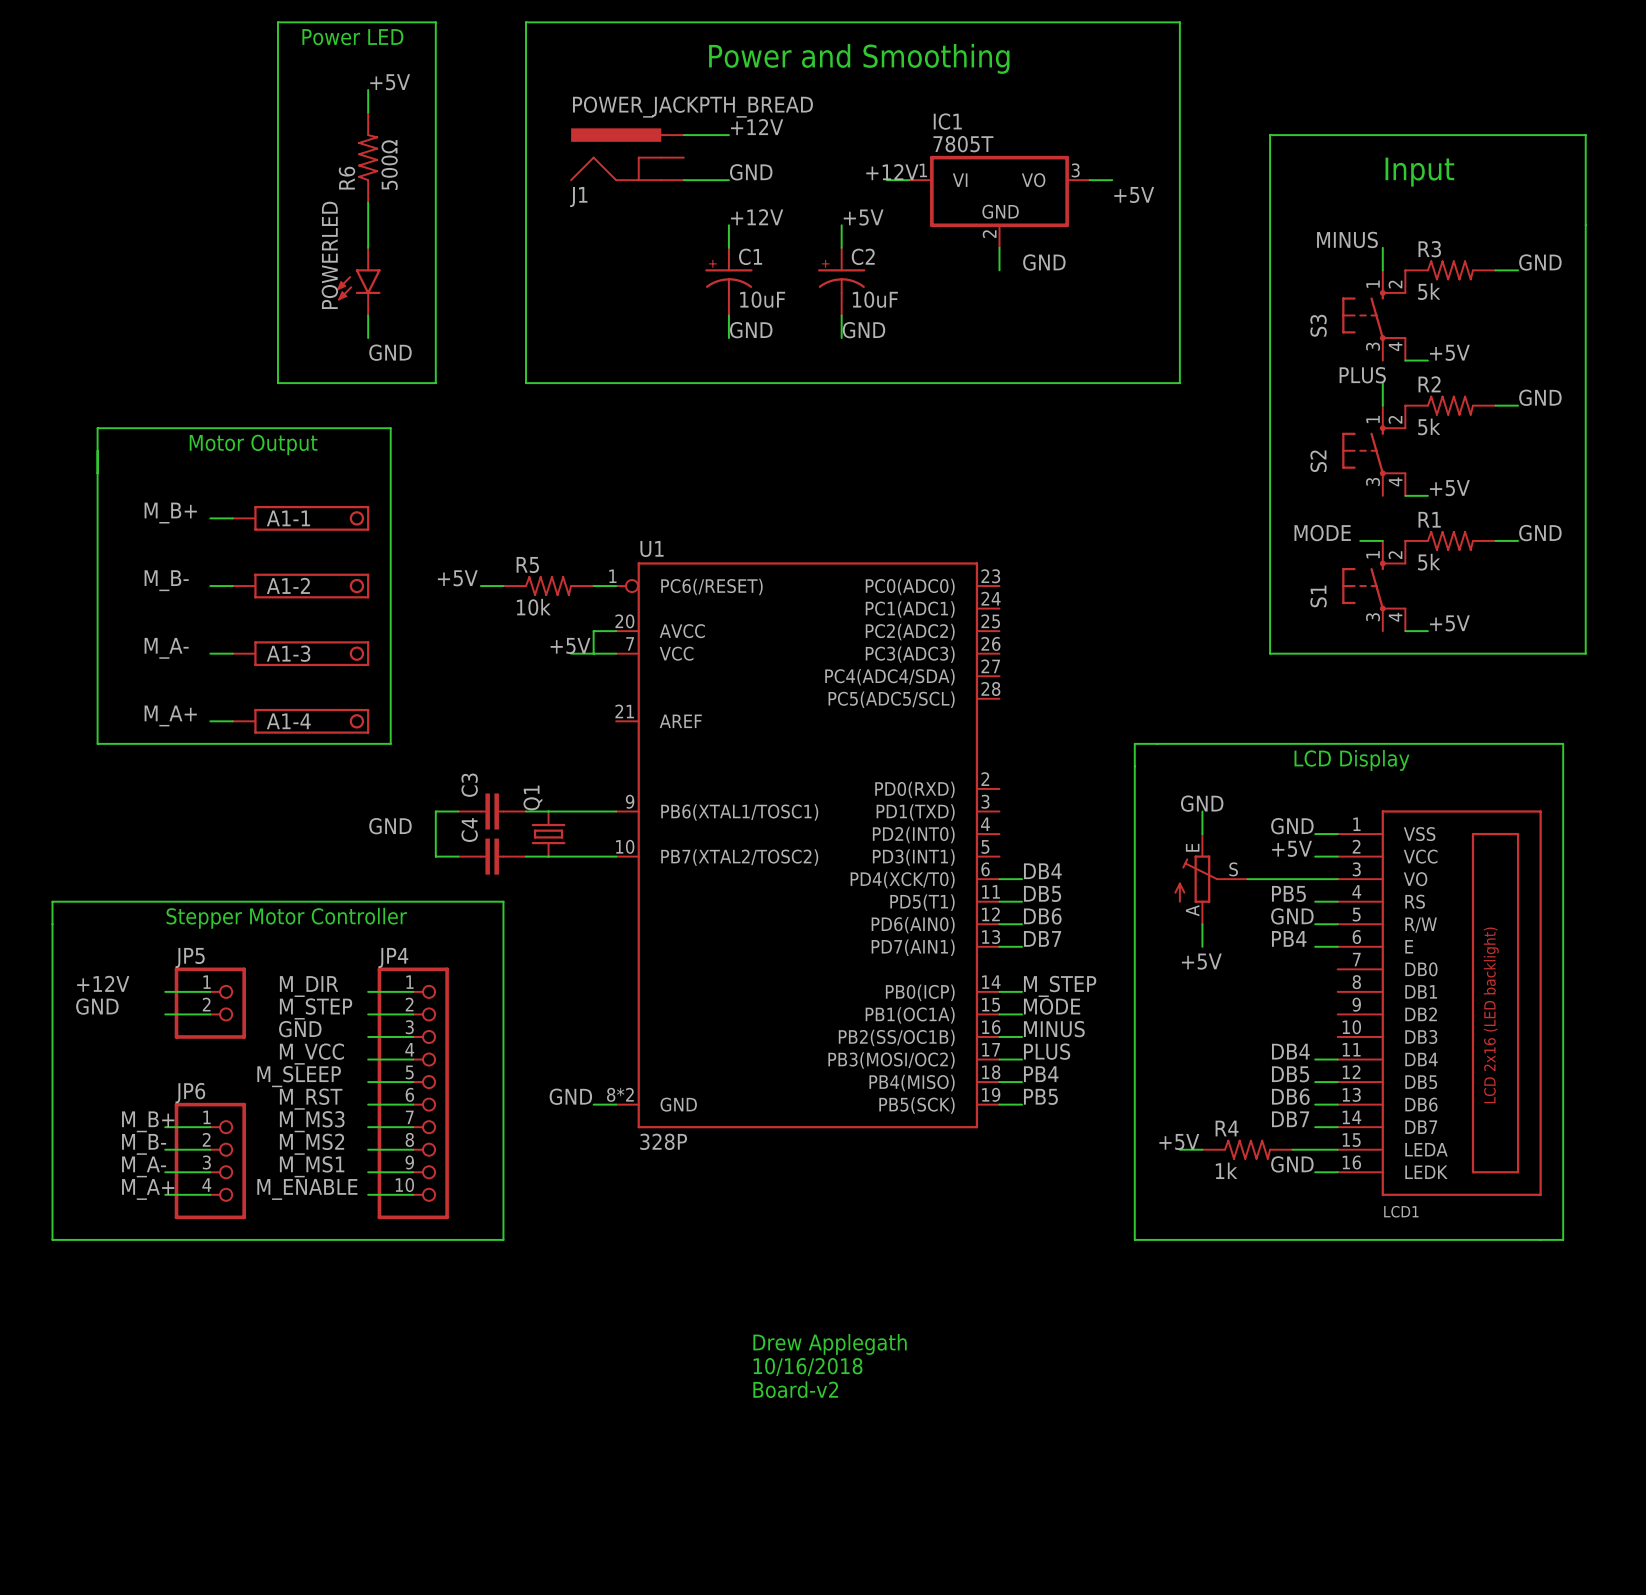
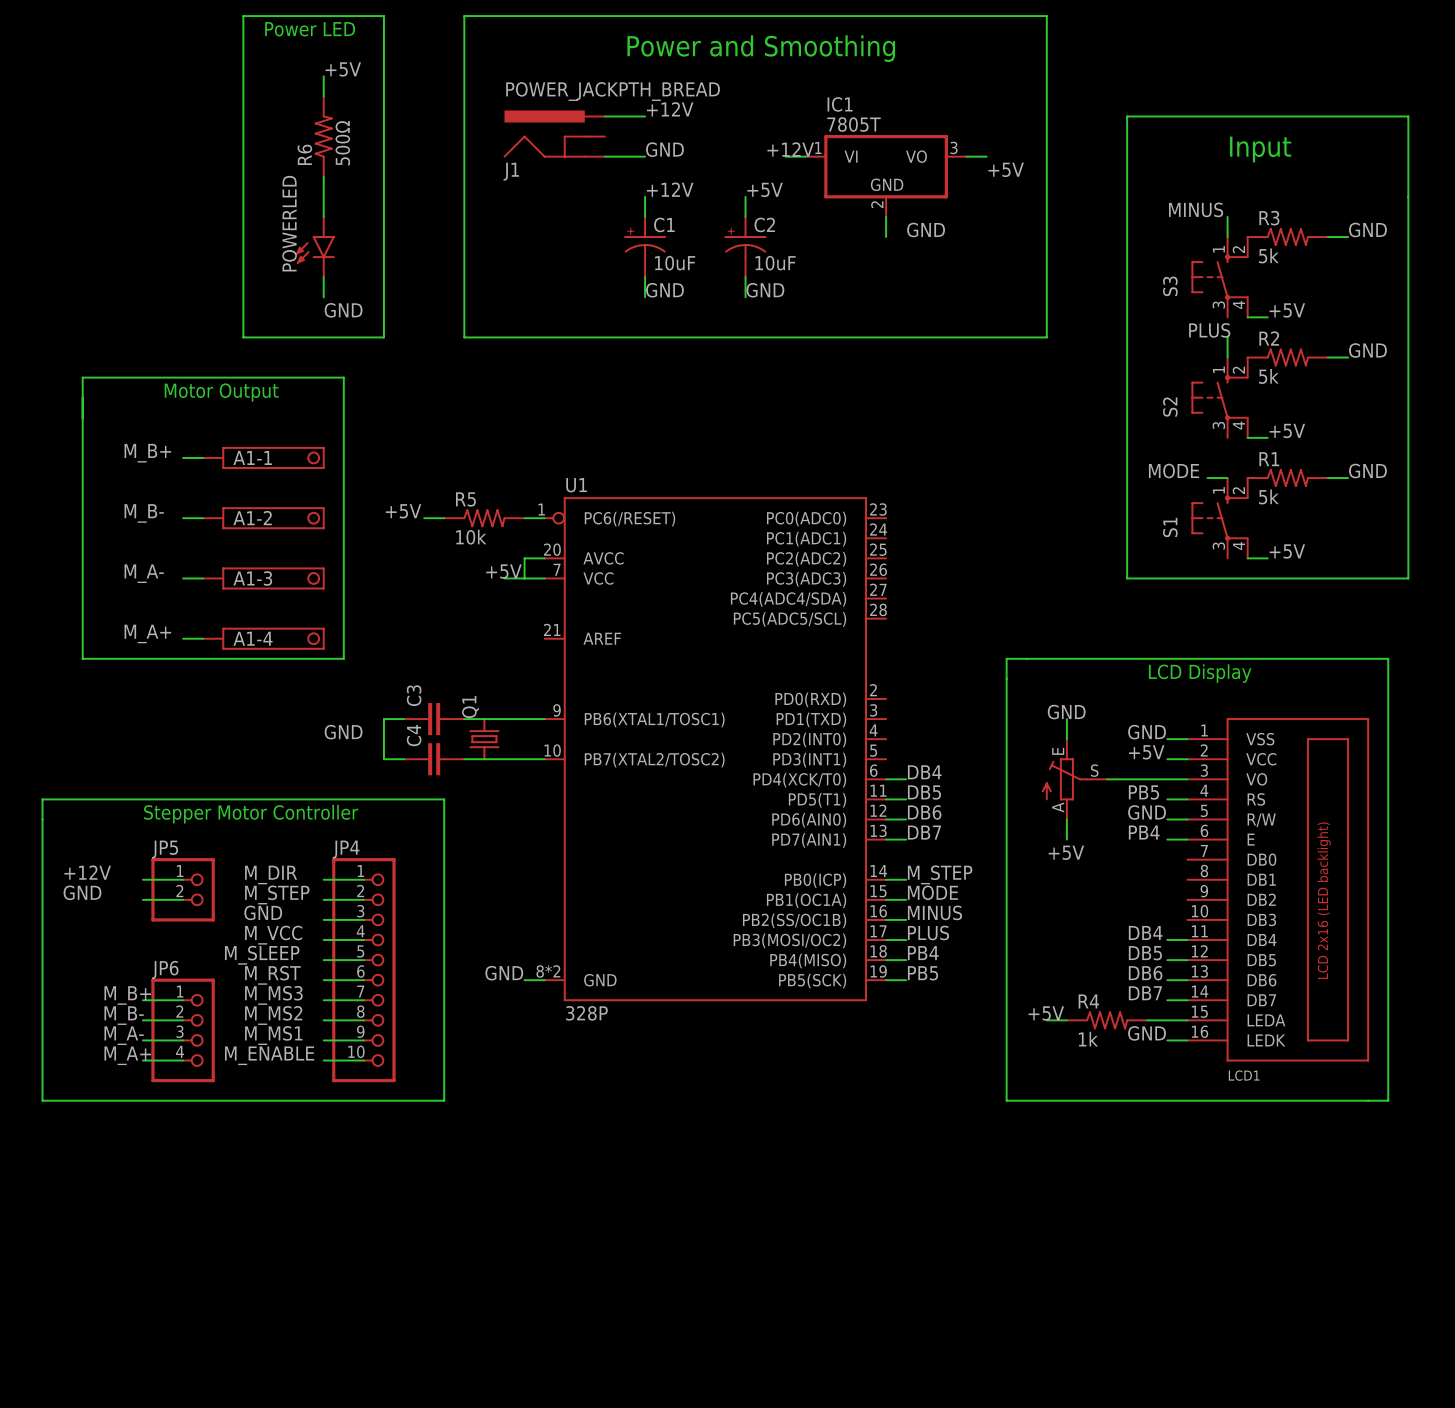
text: Drew Applegath (830, 1344) -> none
text: 10/16/2018 (808, 1367) -> none
text: Board-v2 (795, 1389) -> none

